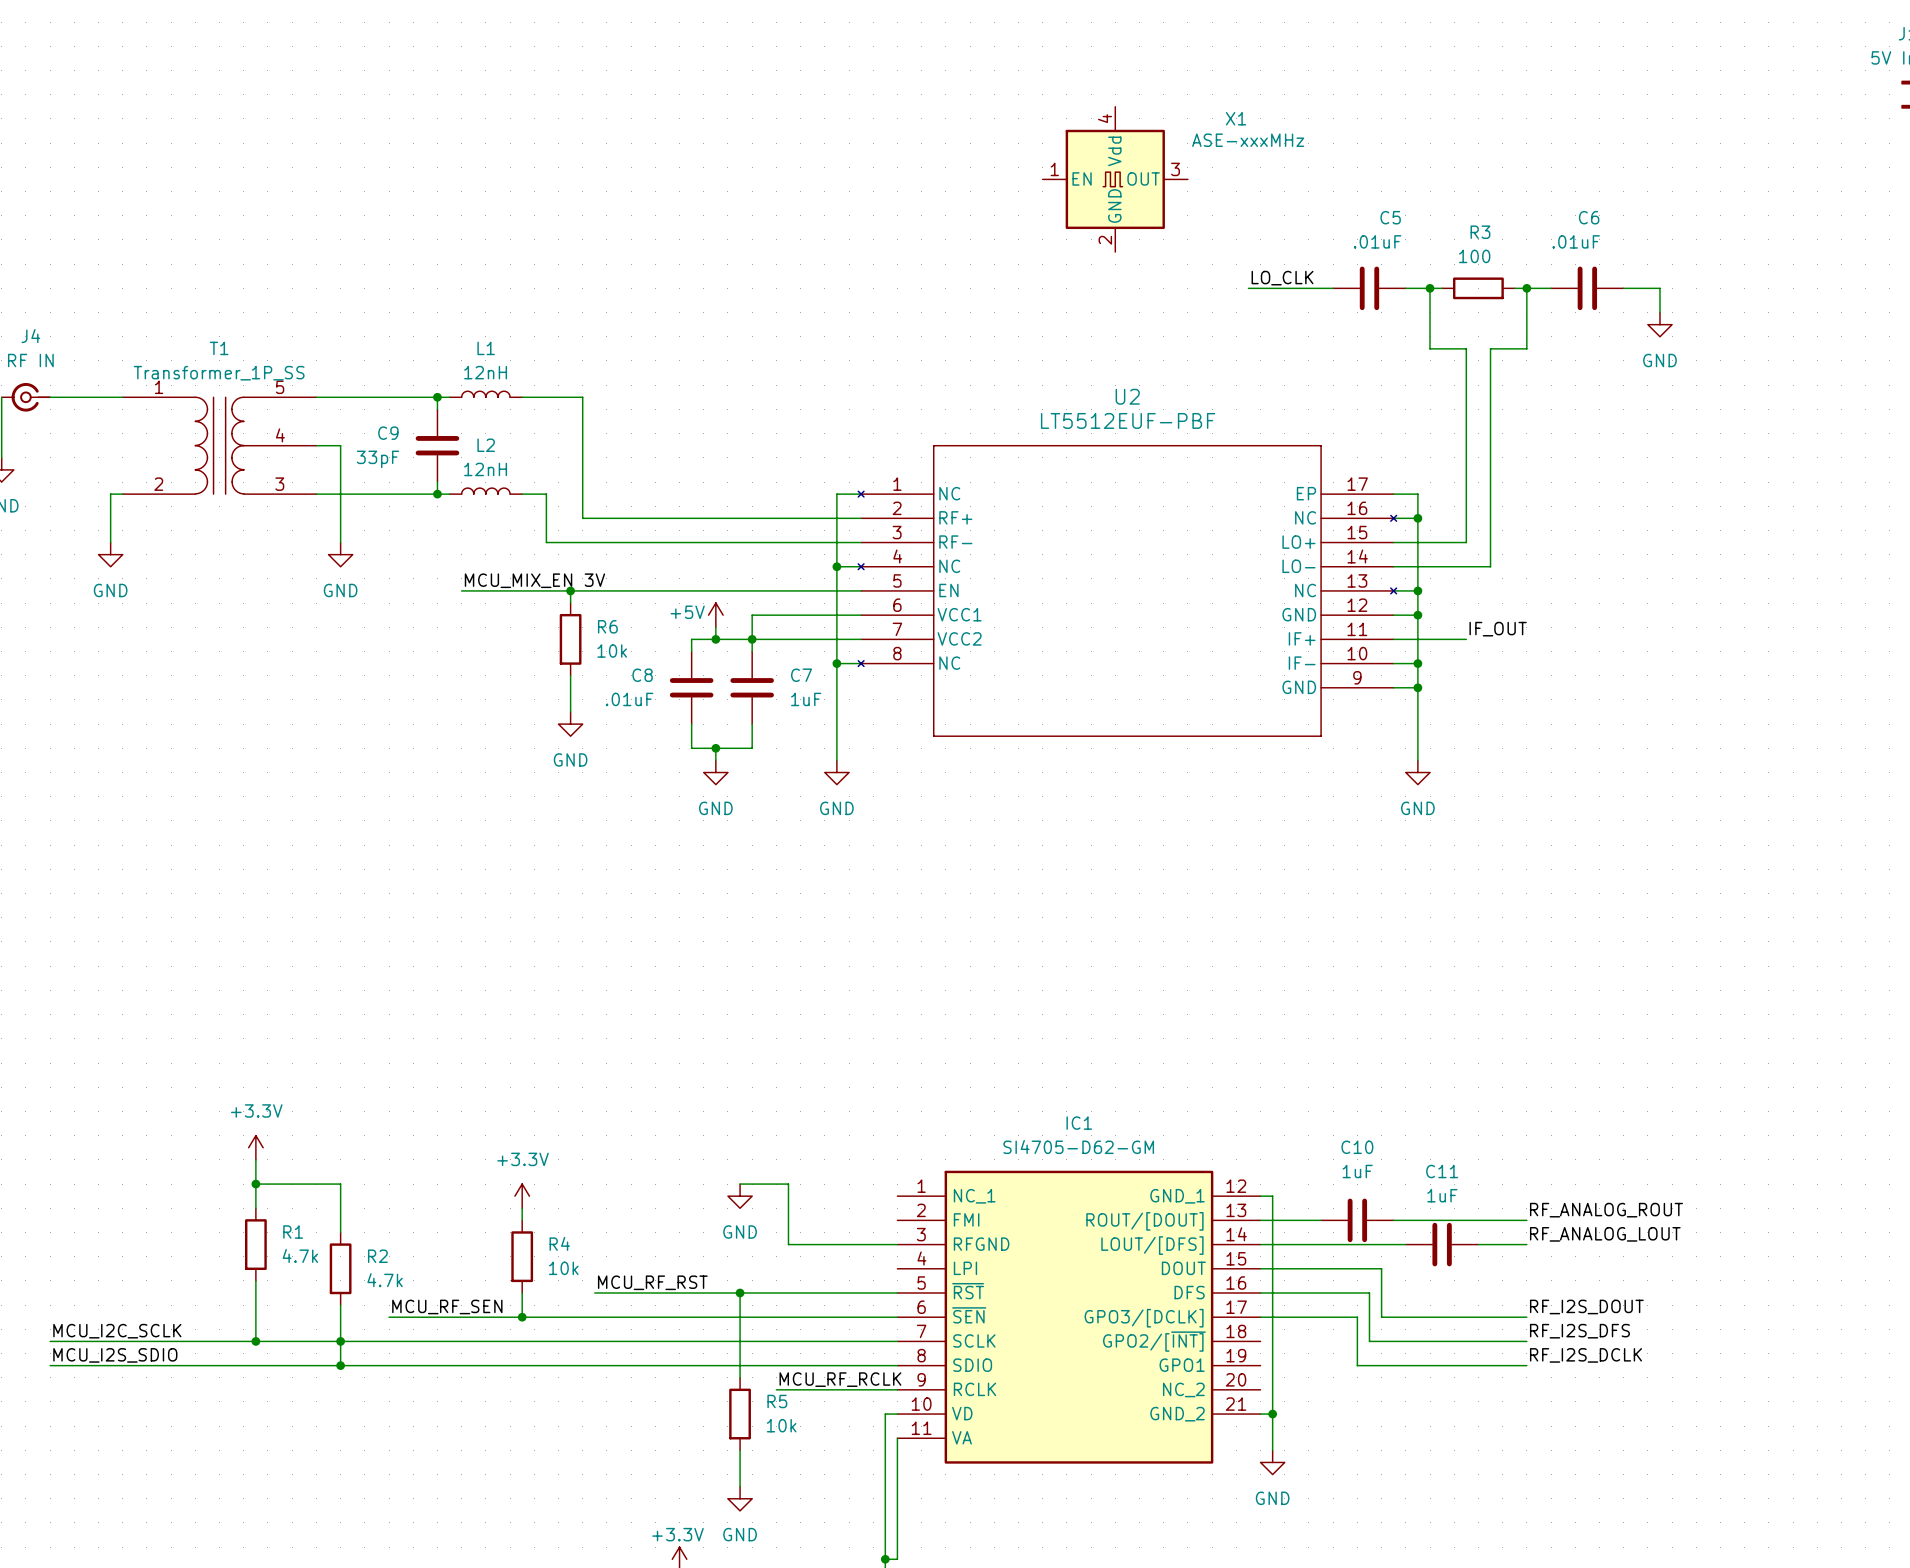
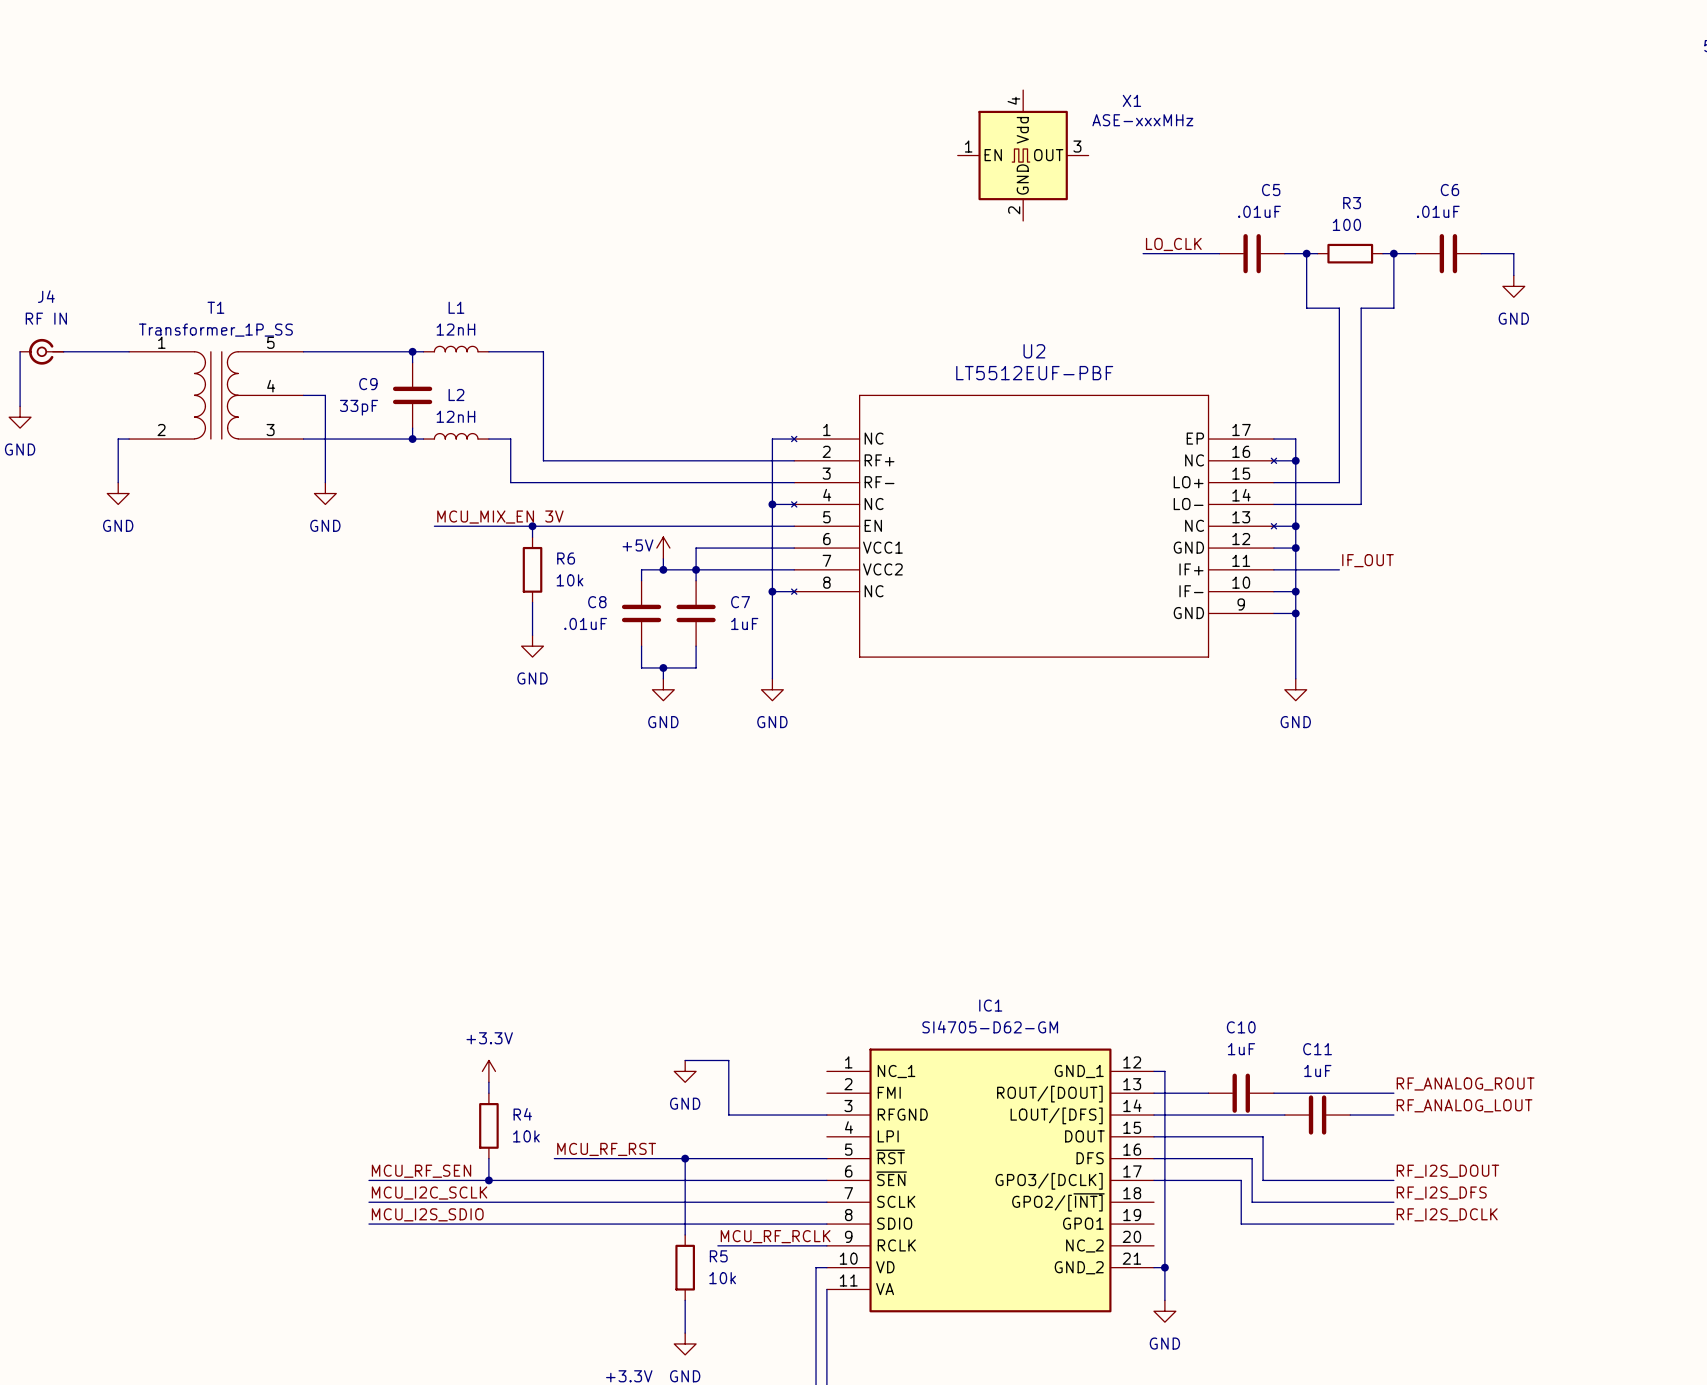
power symbol: +3.3V (255, 1147) -> none
wire: (255, 1159) (255, 1208) -> none
wire: (255, 1184) (340, 1184) (340, 1232) -> none
junction: (255, 1184) -> none
R1: 4.7k (255, 1244) -> none
R2: 4.7k (340, 1268) -> none
wire: (255, 1280) (255, 1341) -> none
wire: (340, 1305) (340, 1365) -> none
label: MCU_I2C_SCLK (117, 1331) -> none
label: none -> MCU_I2C_SCLK (429, 1193)
wire: (50, 1341) (389, 1341) -> none
junction: (255, 1341) -> none
junction: (340, 1341) -> none
label: MCU_I2S_SDIO (115, 1355) -> none
label: none -> MCU_I2S_SDIO (427, 1214)
wire: (50, 1365) (389, 1365) -> none
junction: (340, 1365) -> none

